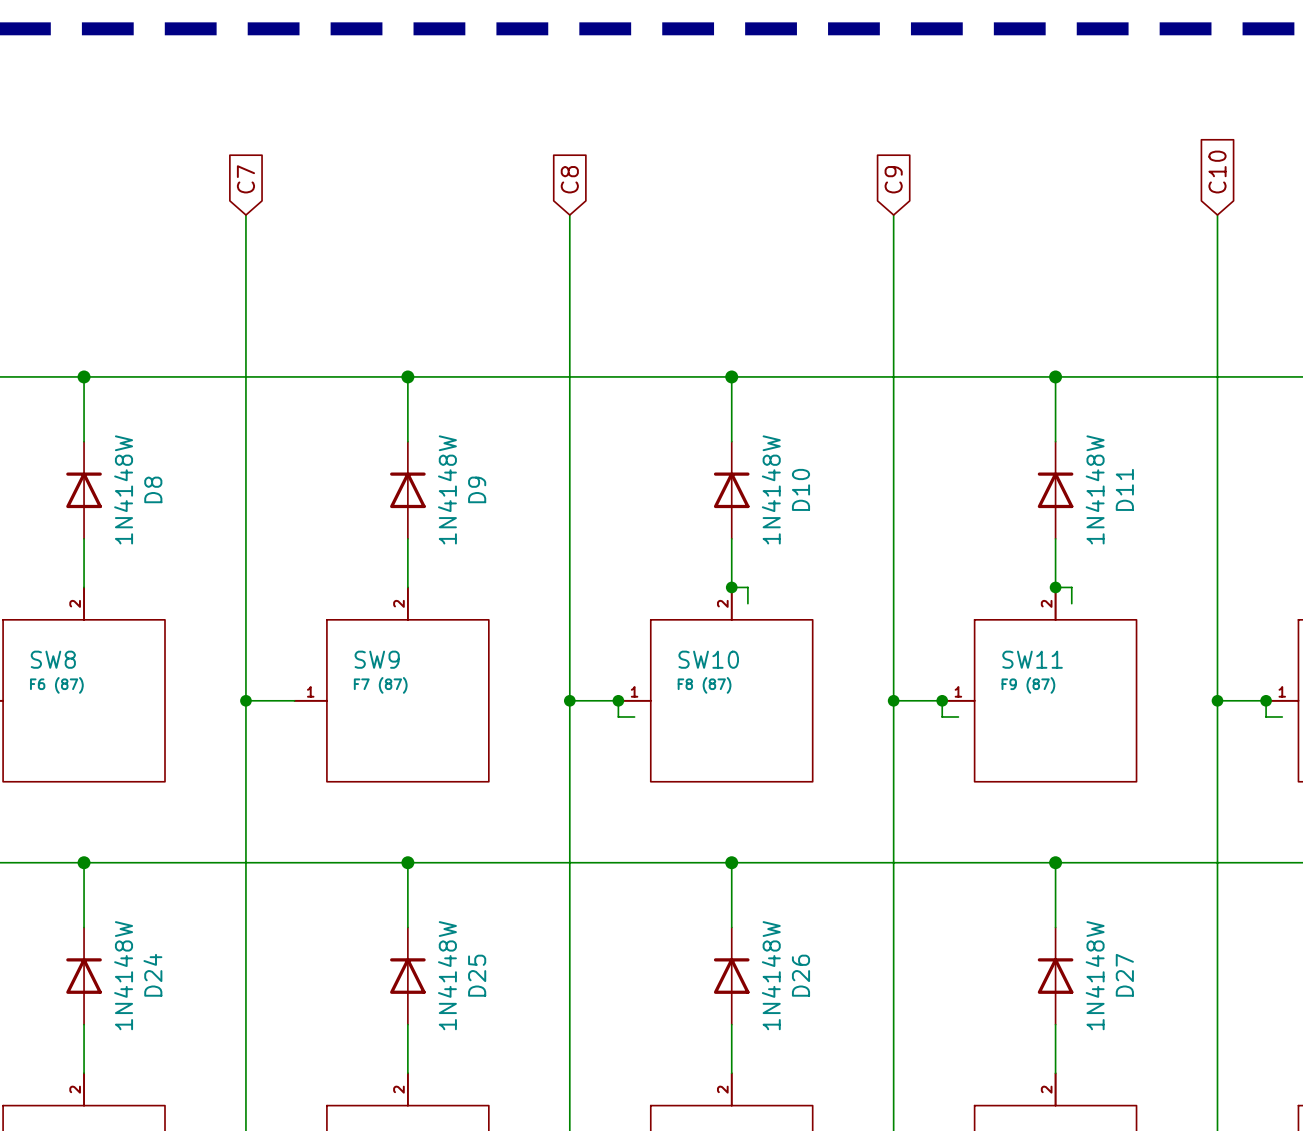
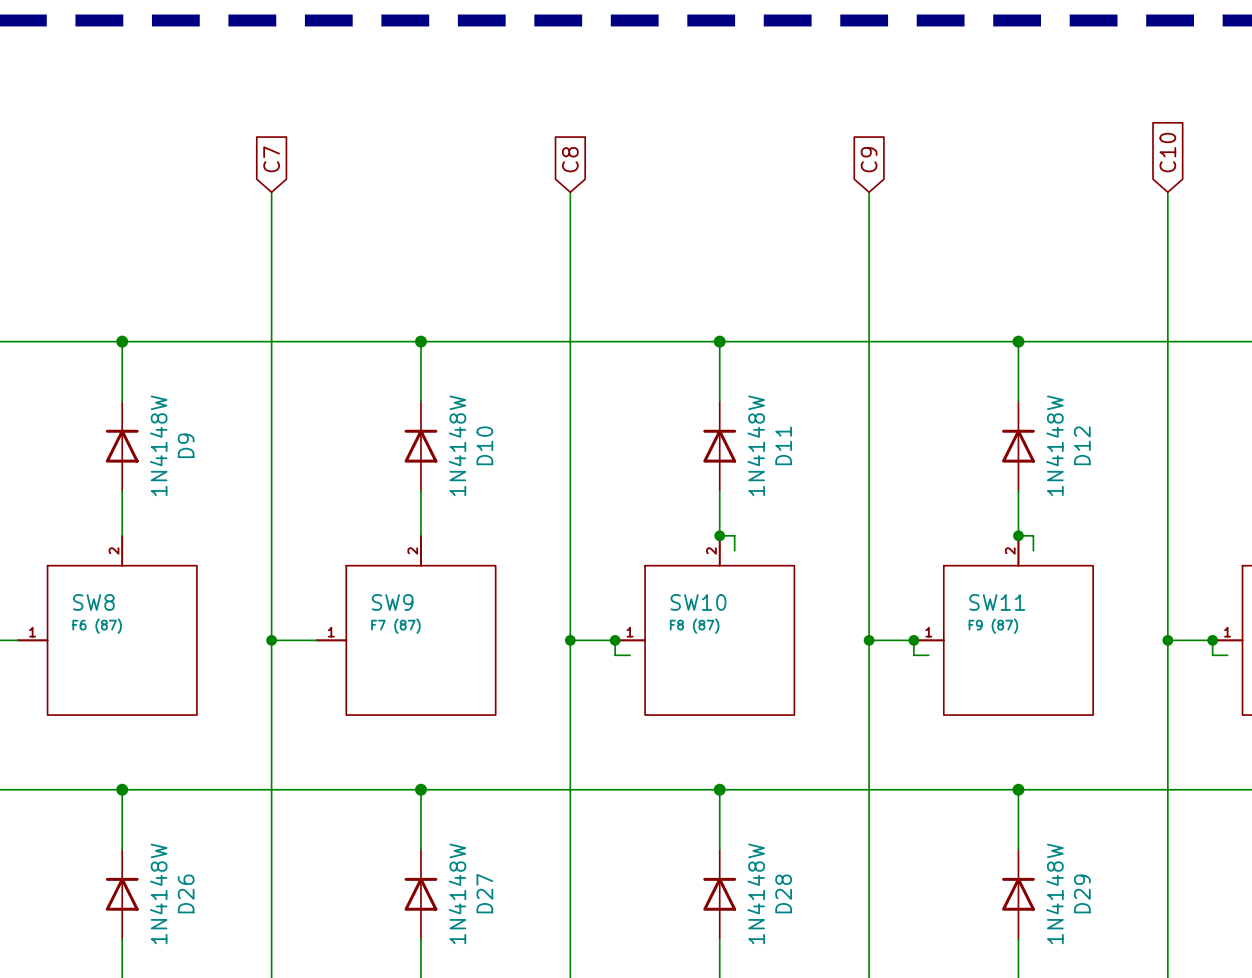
D8 name: D8 (153, 489) -> D9 (186, 445)
D9 name: D9 (477, 489) -> D10 (484, 445)
D10 name: D10 (800, 489) -> D11 (783, 445)
D11 name: D11 (1124, 489) -> D12 (1082, 445)
D24 name: D24 (152, 975) -> D26 (186, 893)
D25 name: D25 (477, 975) -> D27 (484, 893)
D26 name: D26 (800, 975) -> D28 (783, 893)
D27 name: D27 (1124, 975) -> D29 (1082, 893)

